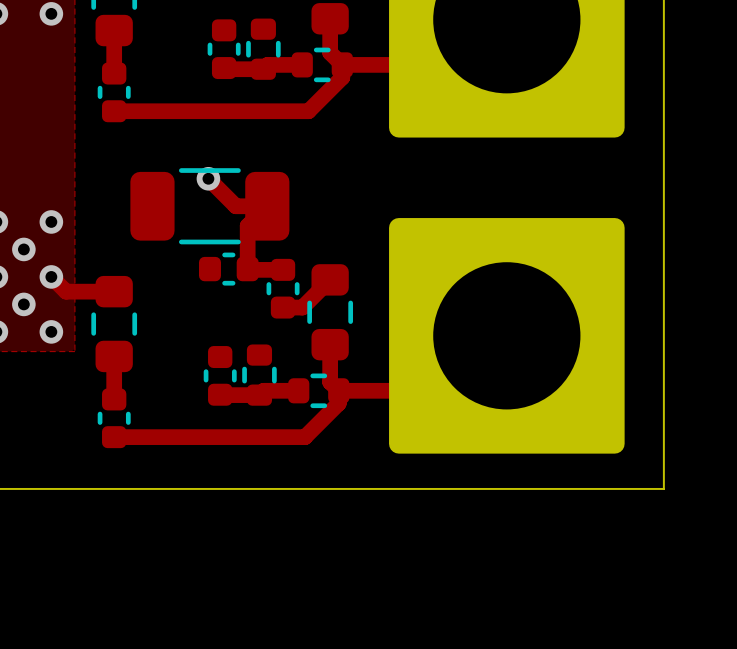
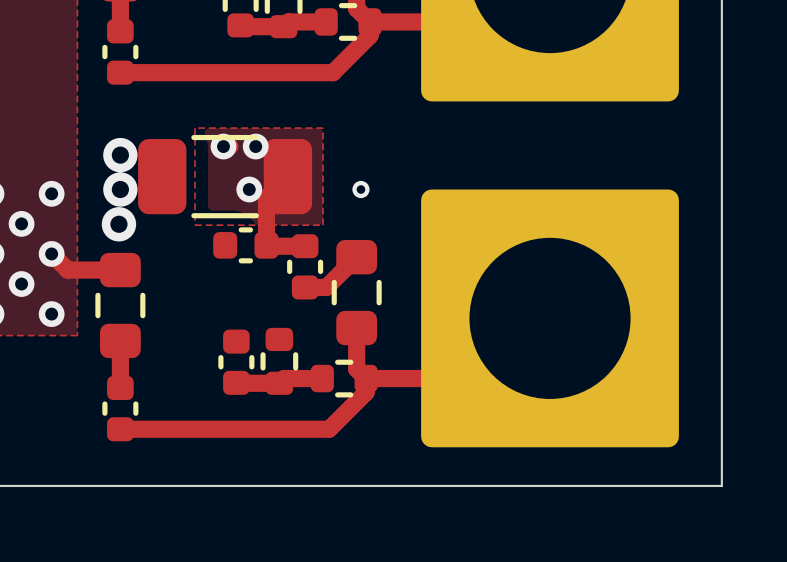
zone outline: none -> (195, 128) (323, 128) (323, 225) (195, 225) (195, 128)
track: (208, 178) (235, 206) (267, 206) -> none
via: none -> (255, 146)
via: none -> (120, 155)
via: none -> (120, 189)
via: none -> (249, 189)
via: none -> (360, 189)
via: none -> (118, 224)

